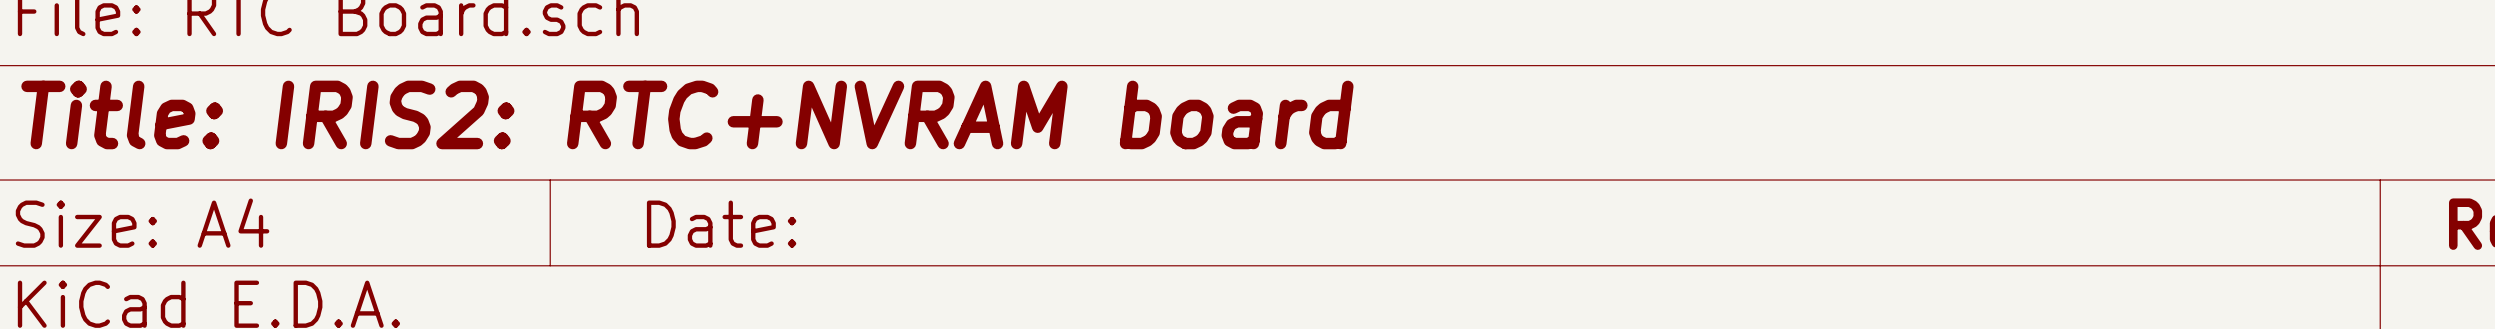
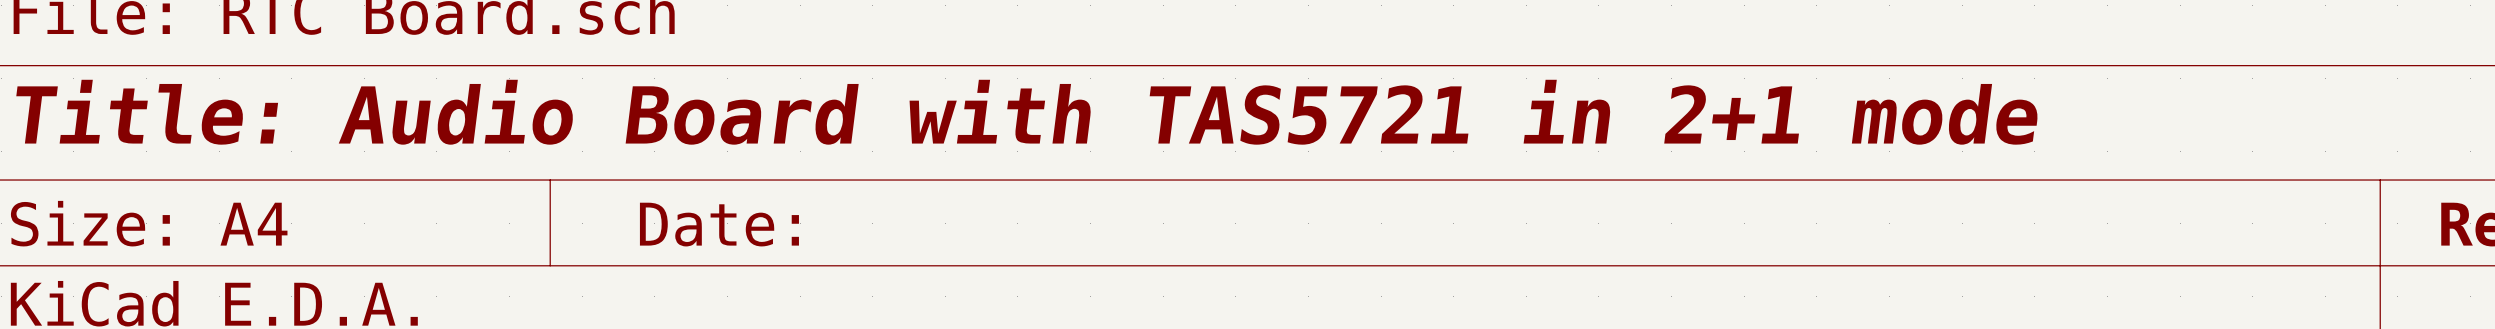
title block: Title: IRIS2: RTC+NVRAM board (687, 114) -> Title: Audio Board with TAS5721 in 2+1 mode (1027, 112)

